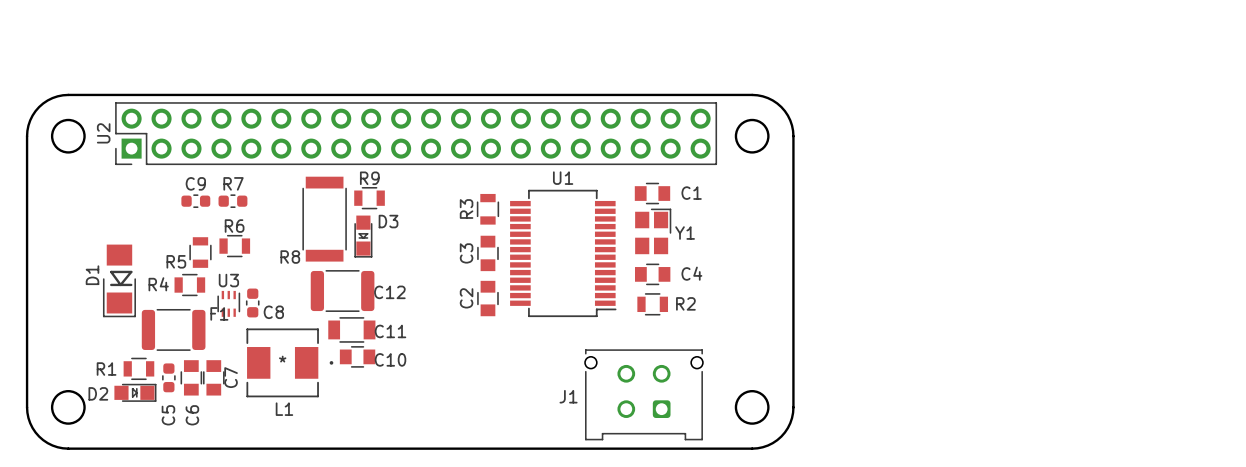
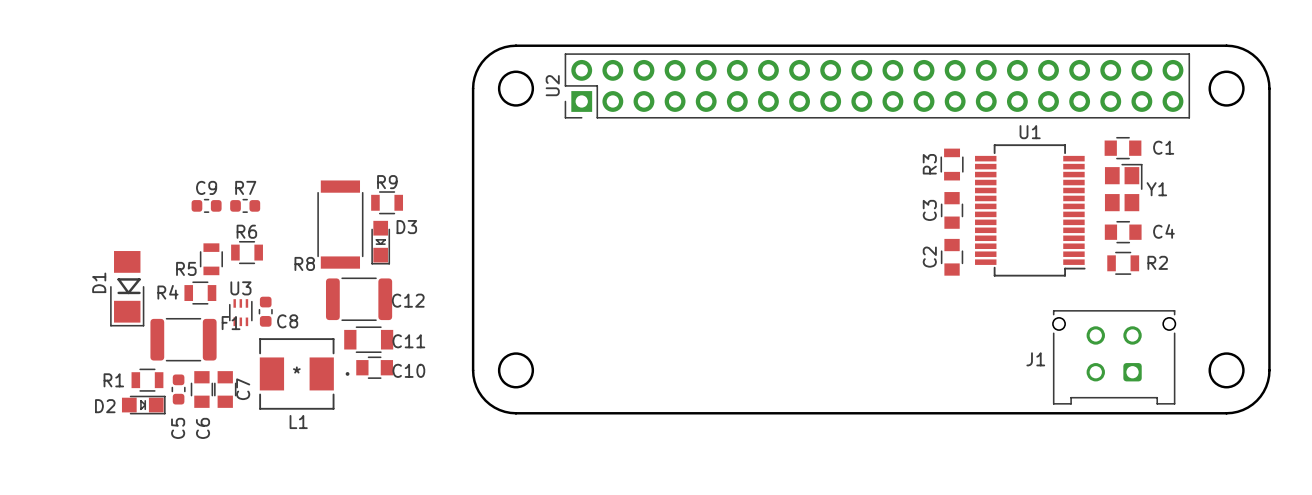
board edge: none -> (515, 45) (1226, 45) (1242, 48) (1260, 62) (1269, 83) (1269, 370) (1266, 386) (1252, 404) (1237, 411) (1226, 413) (515, 413) (499, 410) (481, 396) (473, 375) (473, 88) (476, 72) (485, 58) (499, 48) (515, 45)
round board edge: none -> [497, 70, 535, 107]
round board edge: none -> [1208, 70, 1245, 107]
board edge: (68, 94) (752, 94) (767, 98) (784, 111) (793, 130) (793, 407) (790, 423) (777, 440) (762, 447) (752, 448) (68, 448) (52, 445) (35, 432) (27, 412) (27, 136) (30, 120) (39, 107) (52, 98) (68, 94) -> none
round board edge: [50, 118, 86, 154] -> none
round board edge: [734, 118, 770, 154] -> none
U2 position: (416, 133) -> (877, 85)
C1 position: (652, 193) -> (1123, 148)
R3 position: (487, 209) -> (952, 164)
Y1 position: (653, 231) -> (1123, 187)
C3 position: (487, 253) -> (952, 210)
U1 position: (563, 253) -> (1030, 210)
C4 position: (652, 274) -> (1123, 232)
C2 position: (487, 298) -> (952, 257)
R2 position: (652, 304) -> (1123, 263)
round board edge: none -> [497, 352, 535, 389]
round board edge: none -> [1208, 352, 1245, 389]
round board edge: [50, 390, 86, 425] -> none
round board edge: [734, 390, 770, 425] -> none
J1 position: (643, 394) -> (1114, 357)

